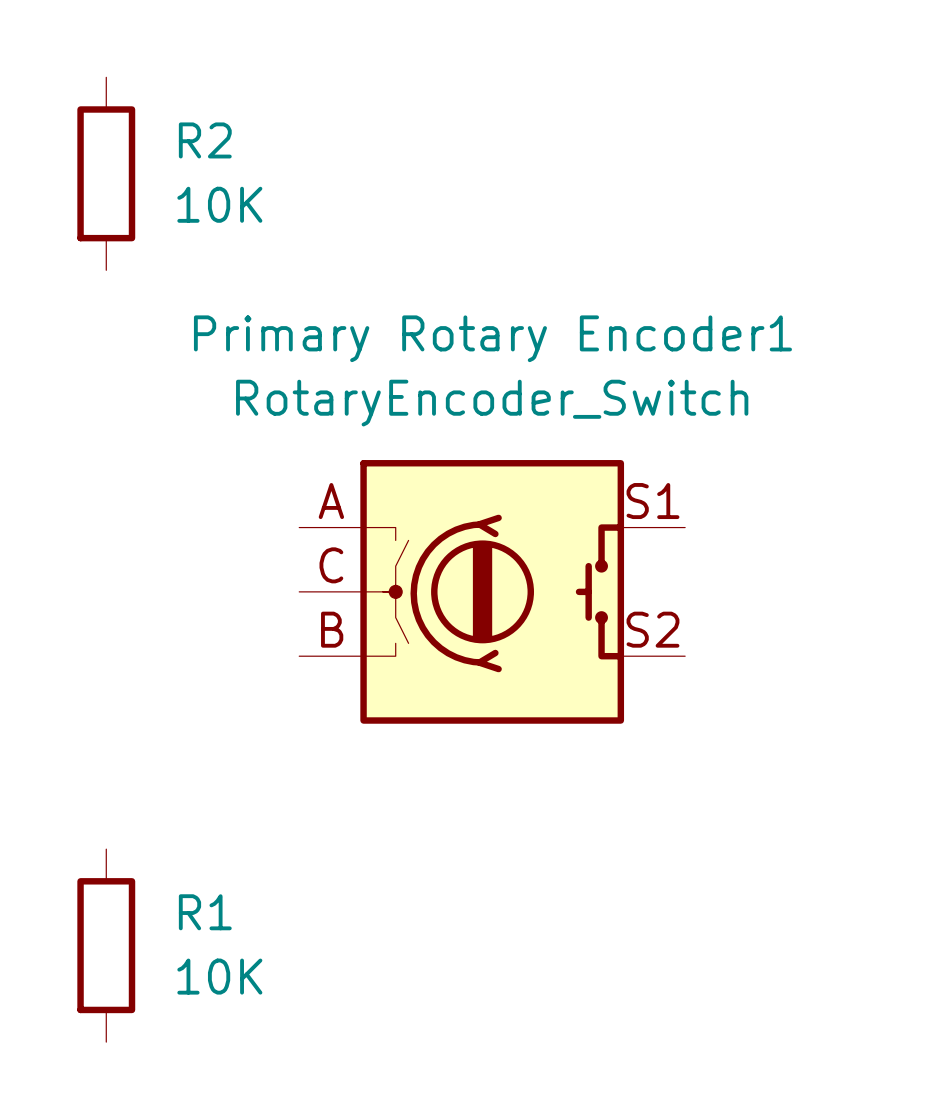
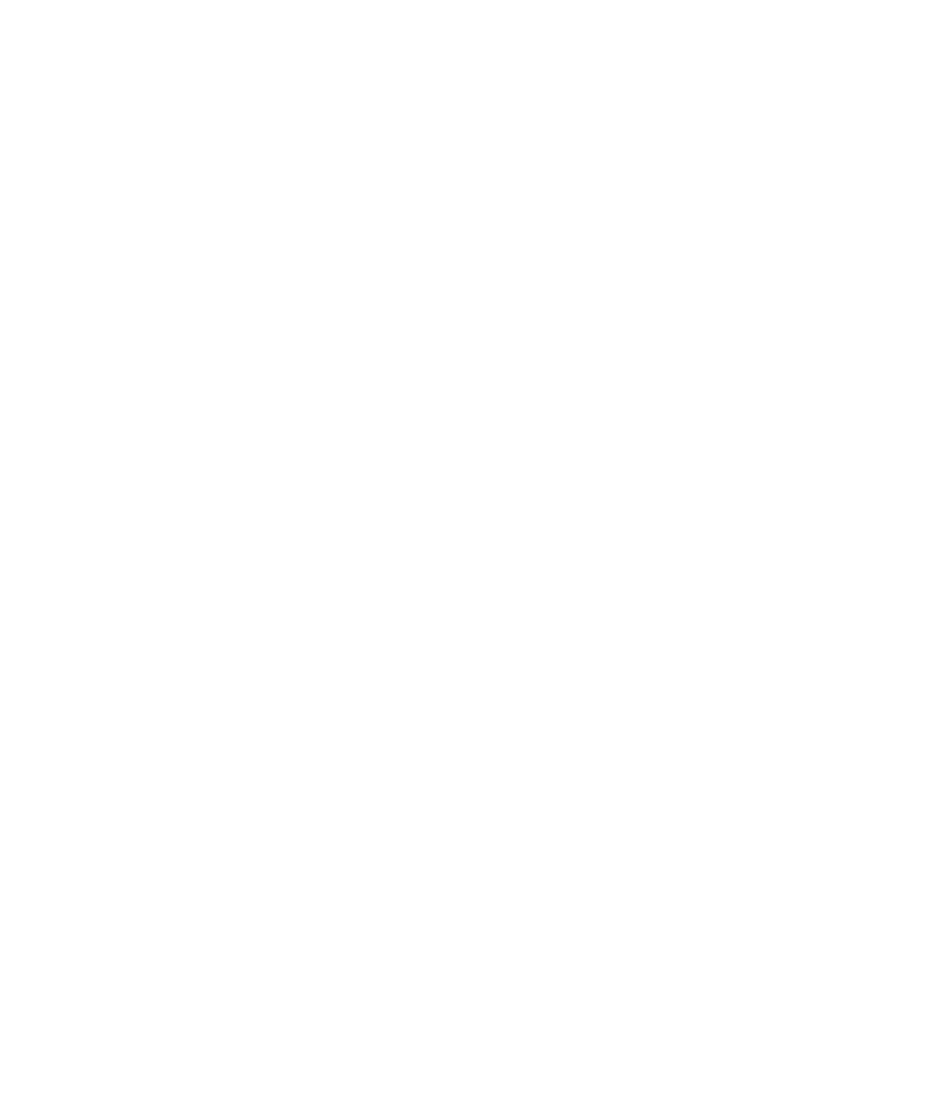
R2: 10K (106, 173) -> none
Primary Rotary Encoder1: RotaryEncoder_Switch (492, 591) -> none
R1: 10K (106, 945) -> none

